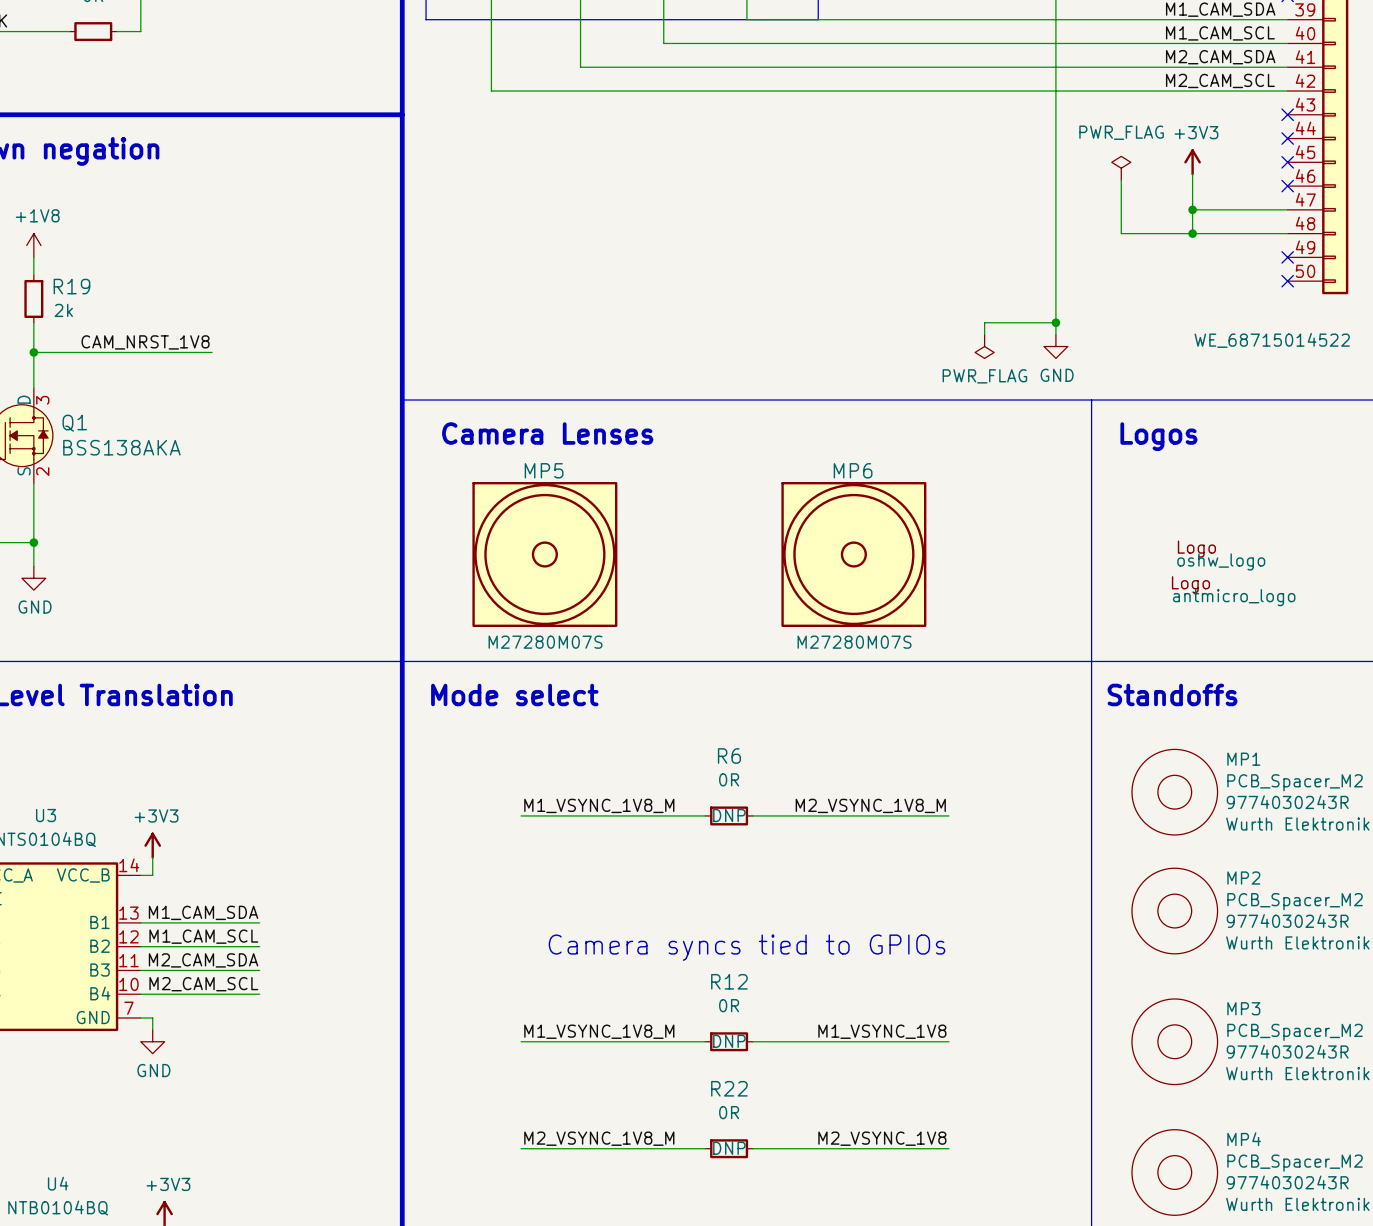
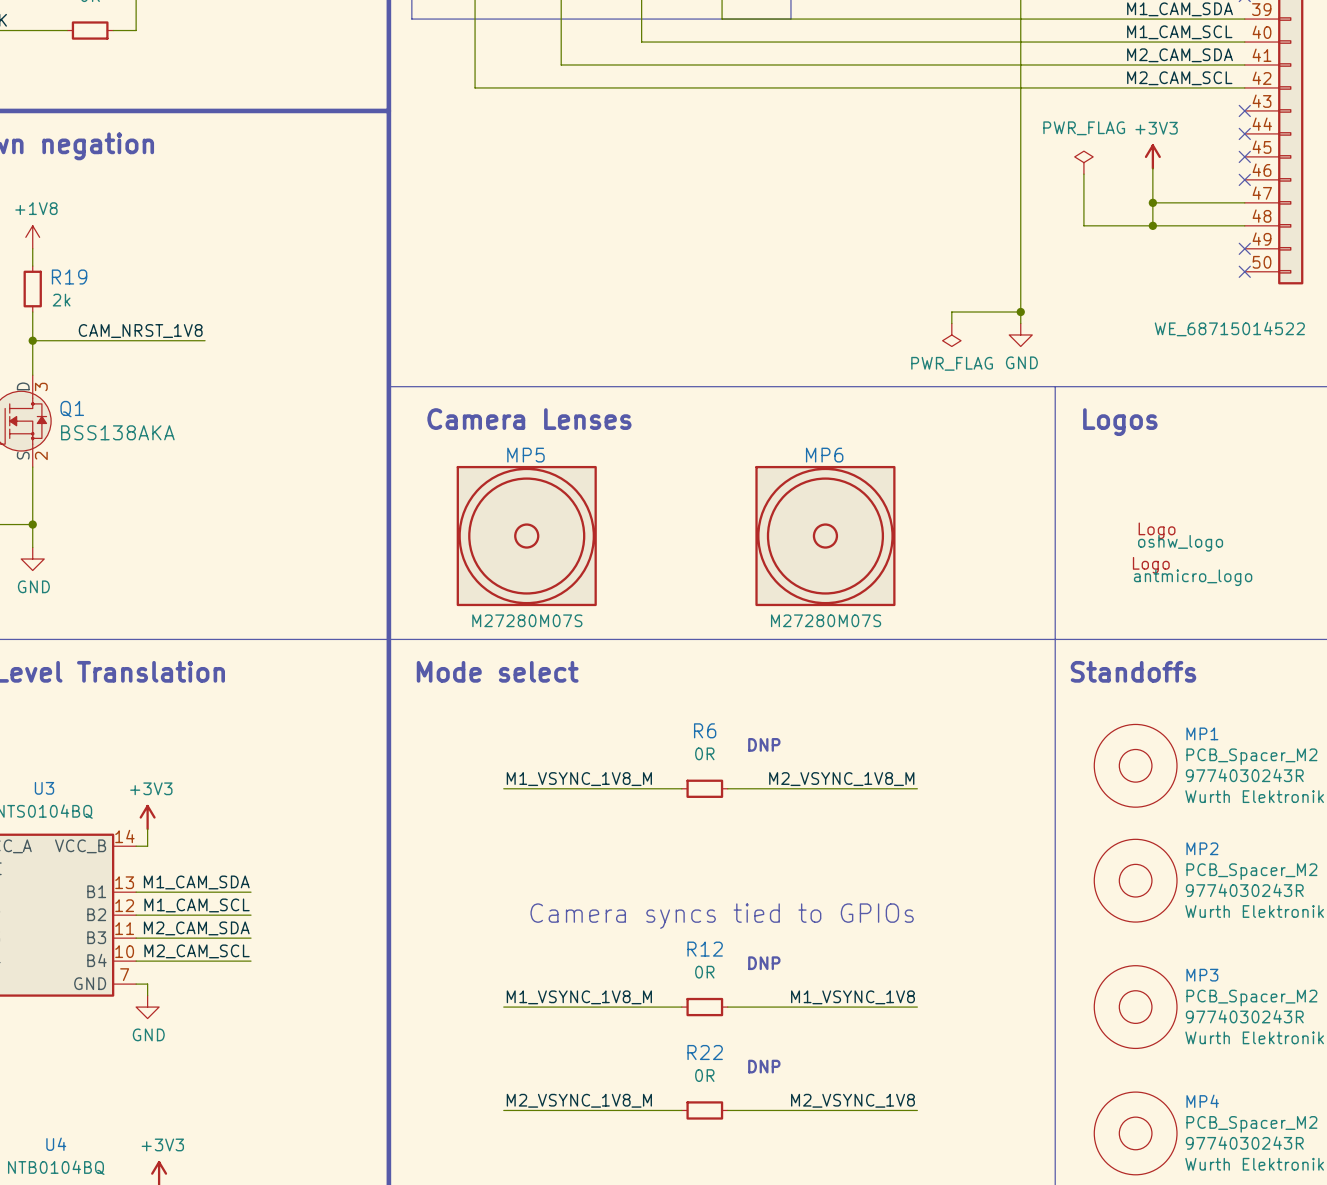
text: none -> DNP (764, 744)
R6 text: DNP (729, 815) -> none
text: none -> DNP (764, 963)
R12 text: DNP (729, 1041) -> none
text: none -> DNP (764, 1066)
R22 text: DNP (729, 1148) -> none

